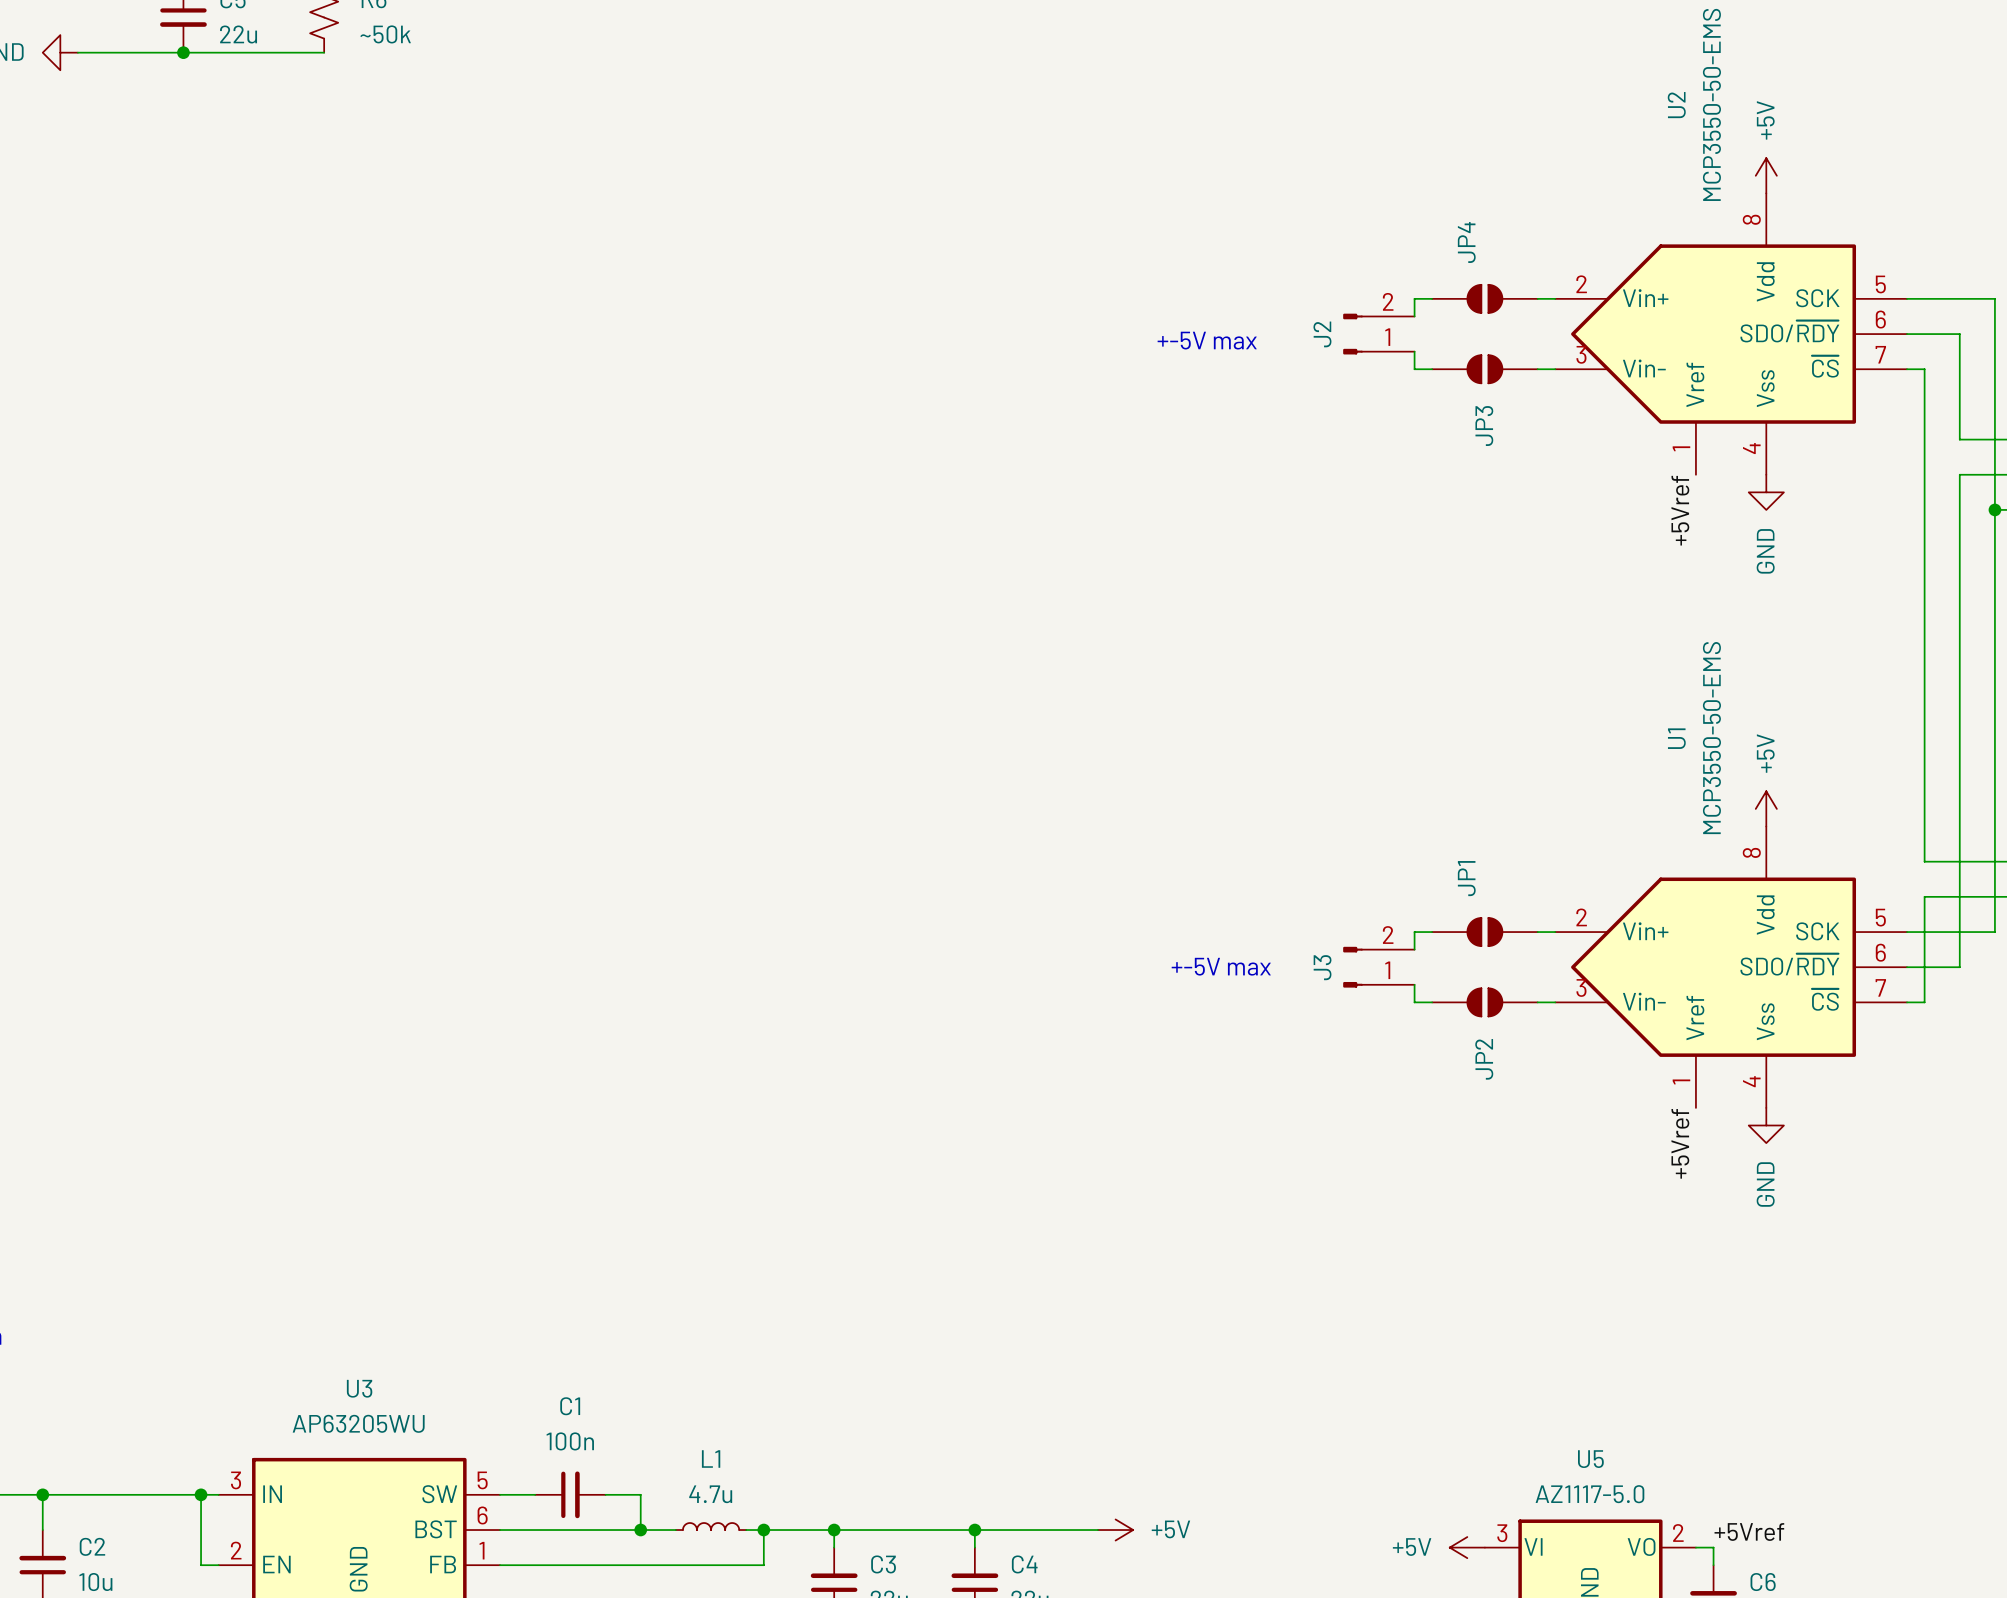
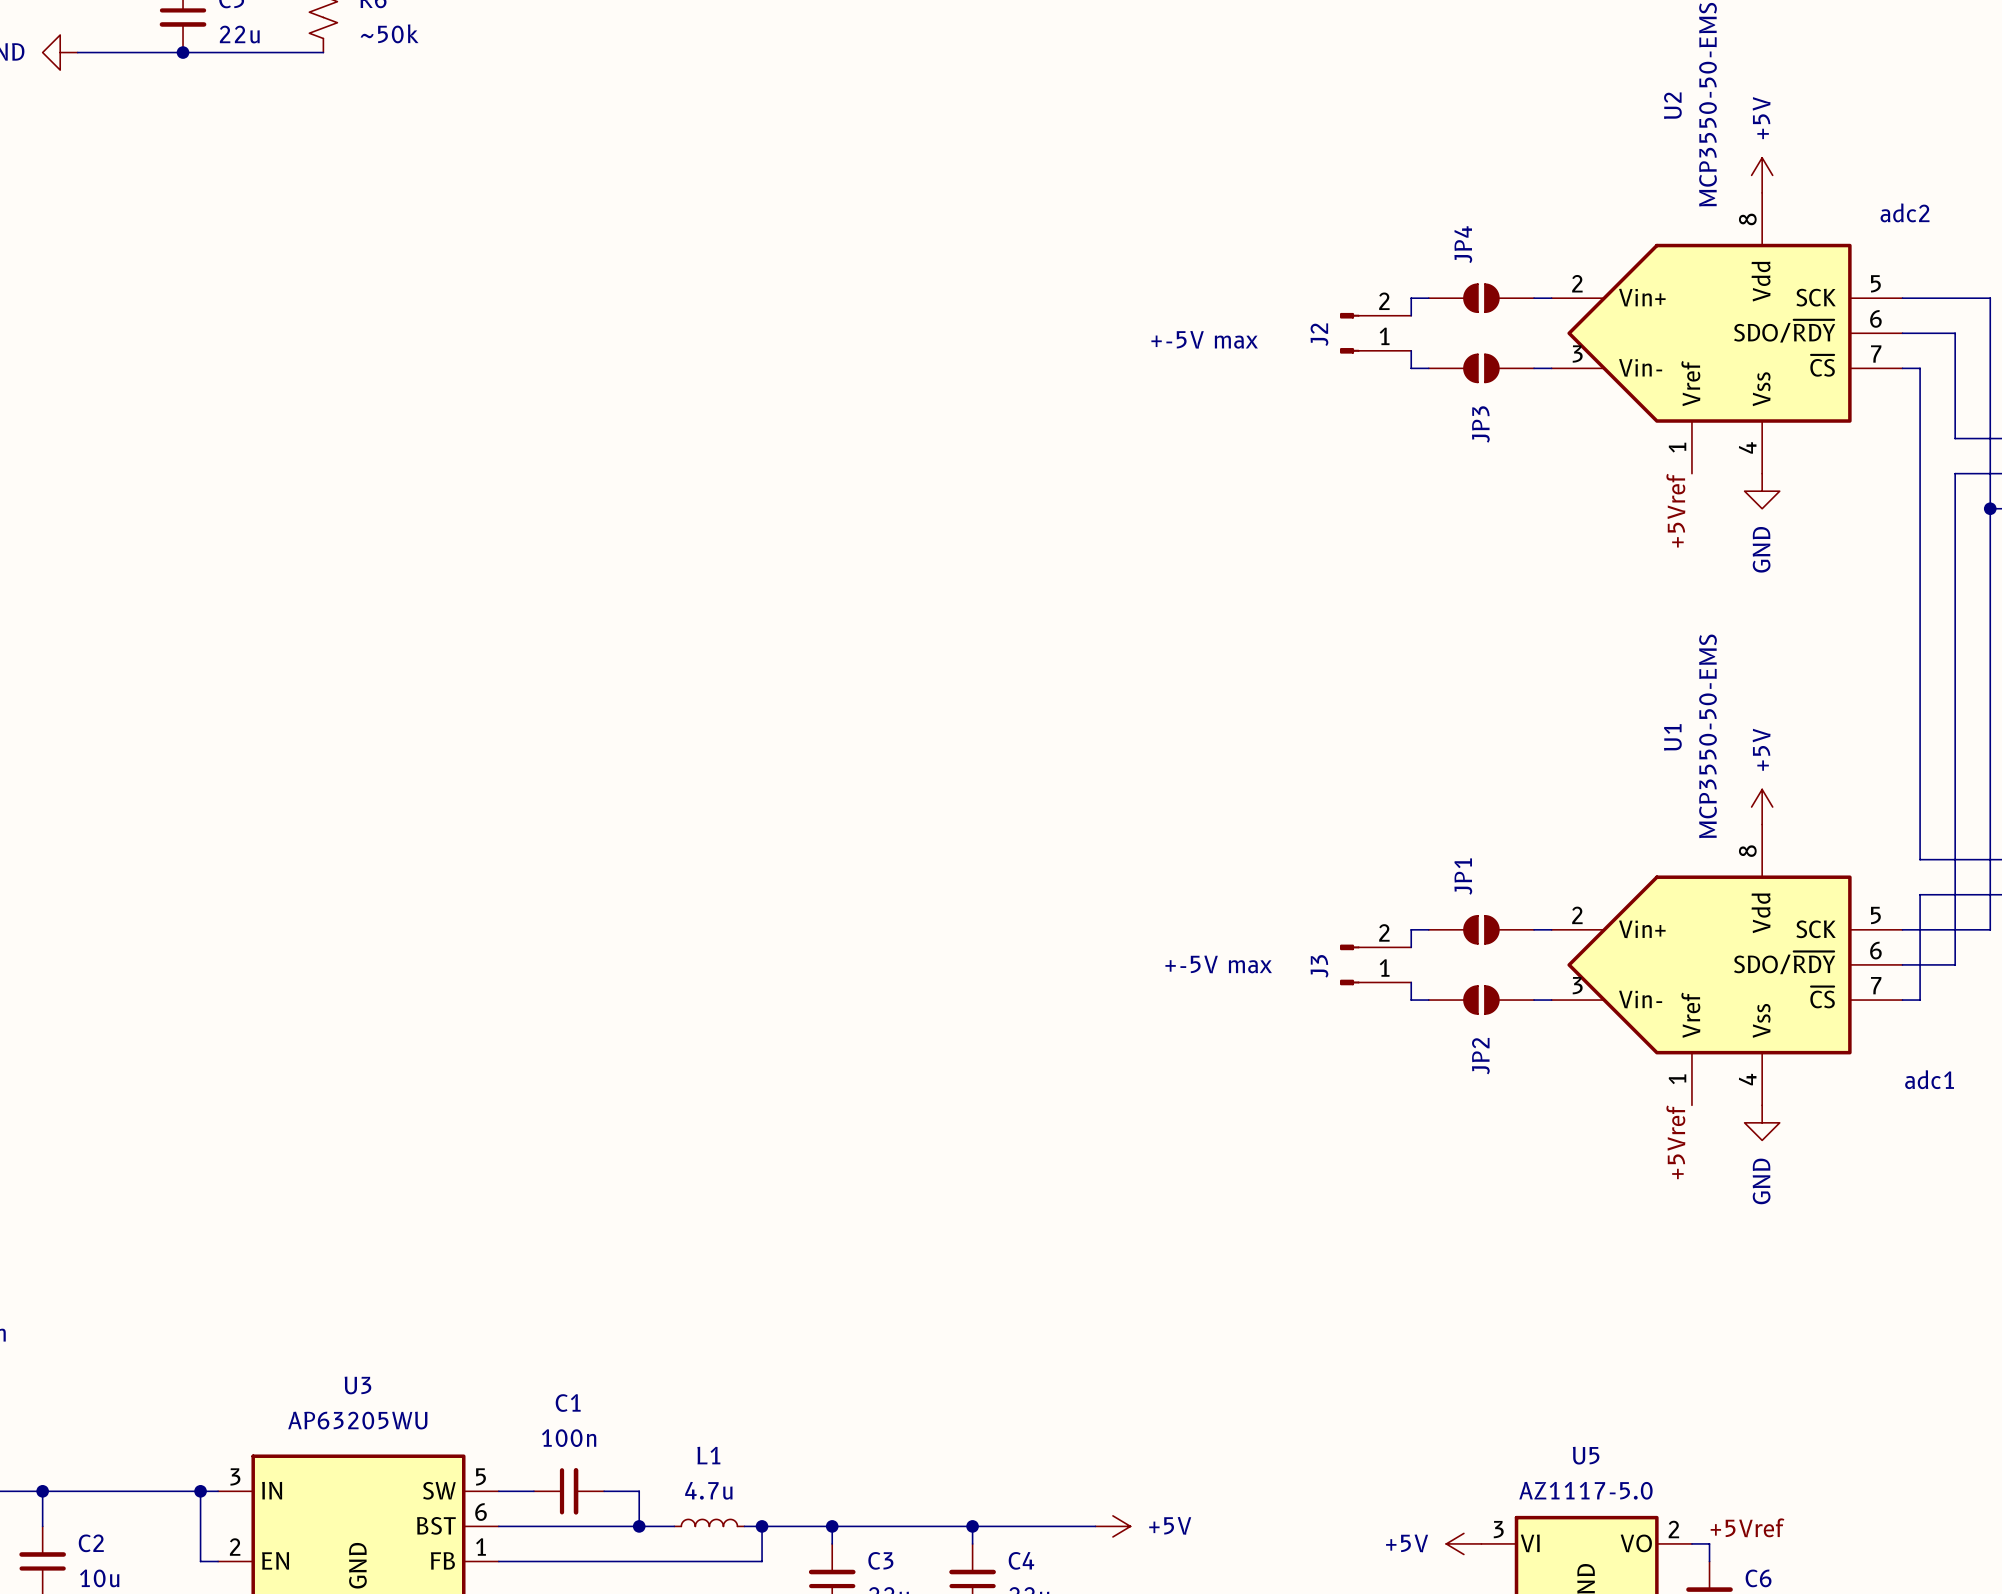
text: none -> adc2 (1905, 212)
text: none -> adc1 (1929, 1079)

